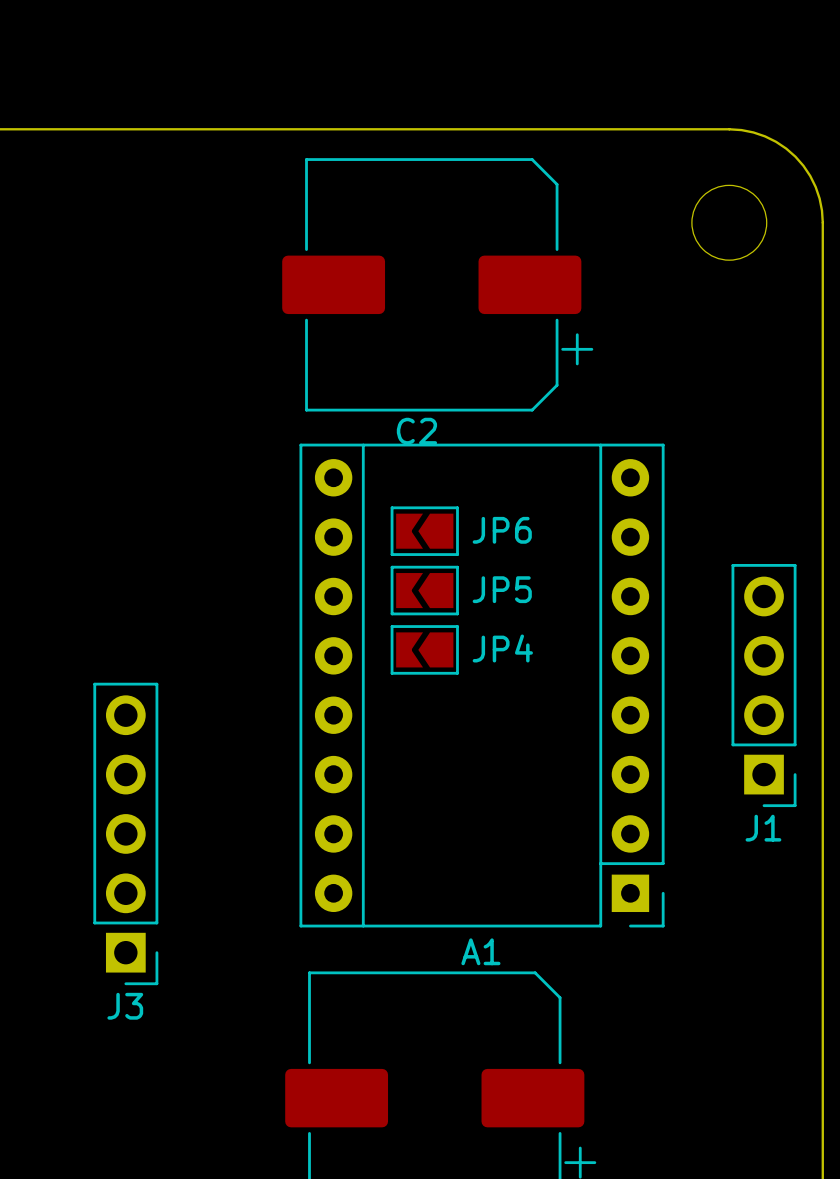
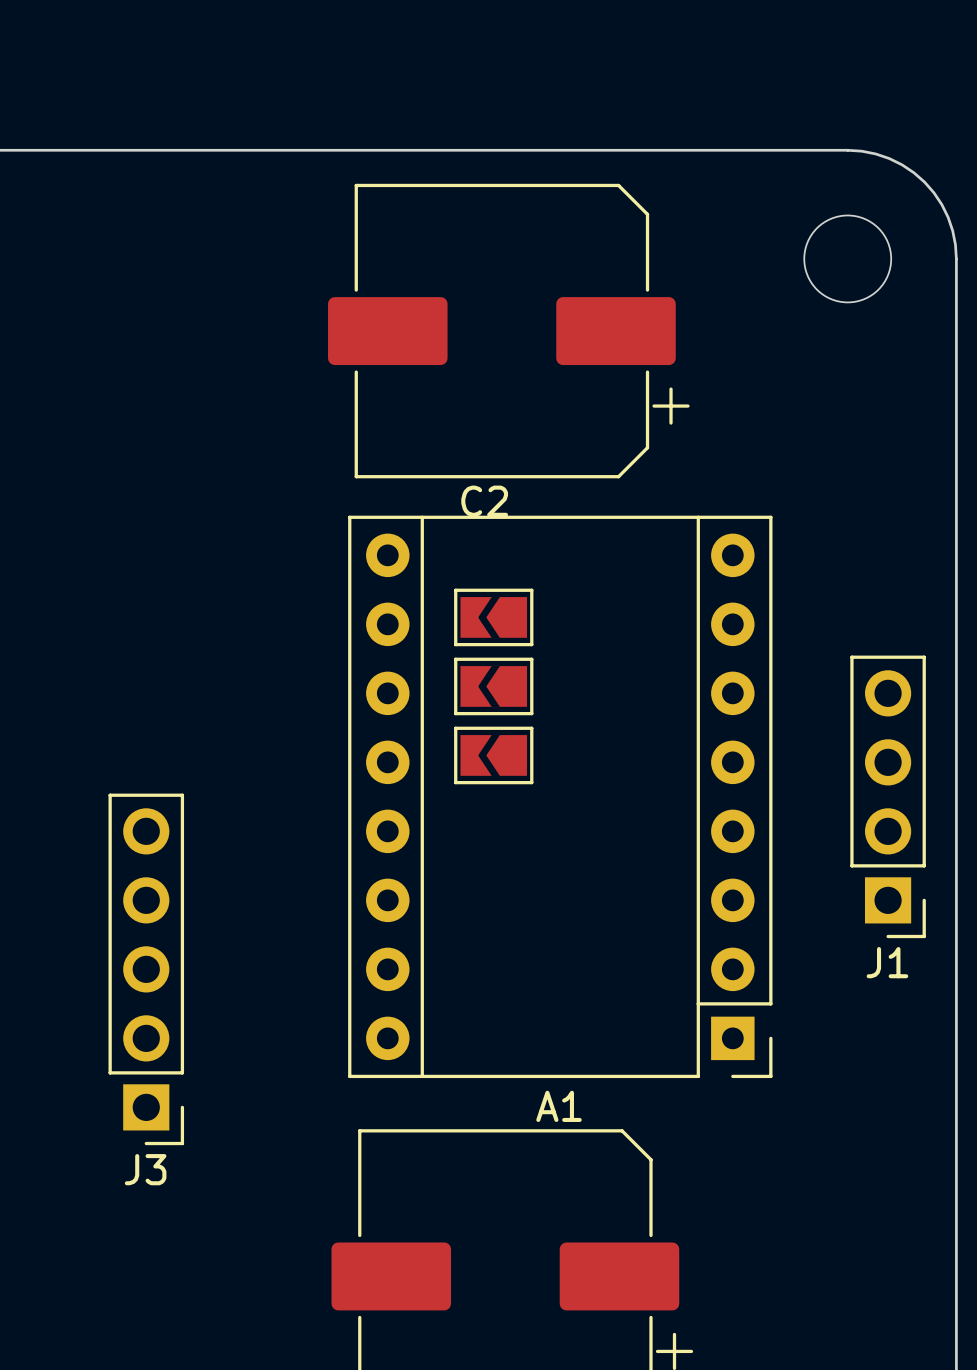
JP6 name: JP6 (502, 530) -> none
JP5 name: JP5 (502, 589) -> none
JP4 name: JP4 (502, 648) -> none

